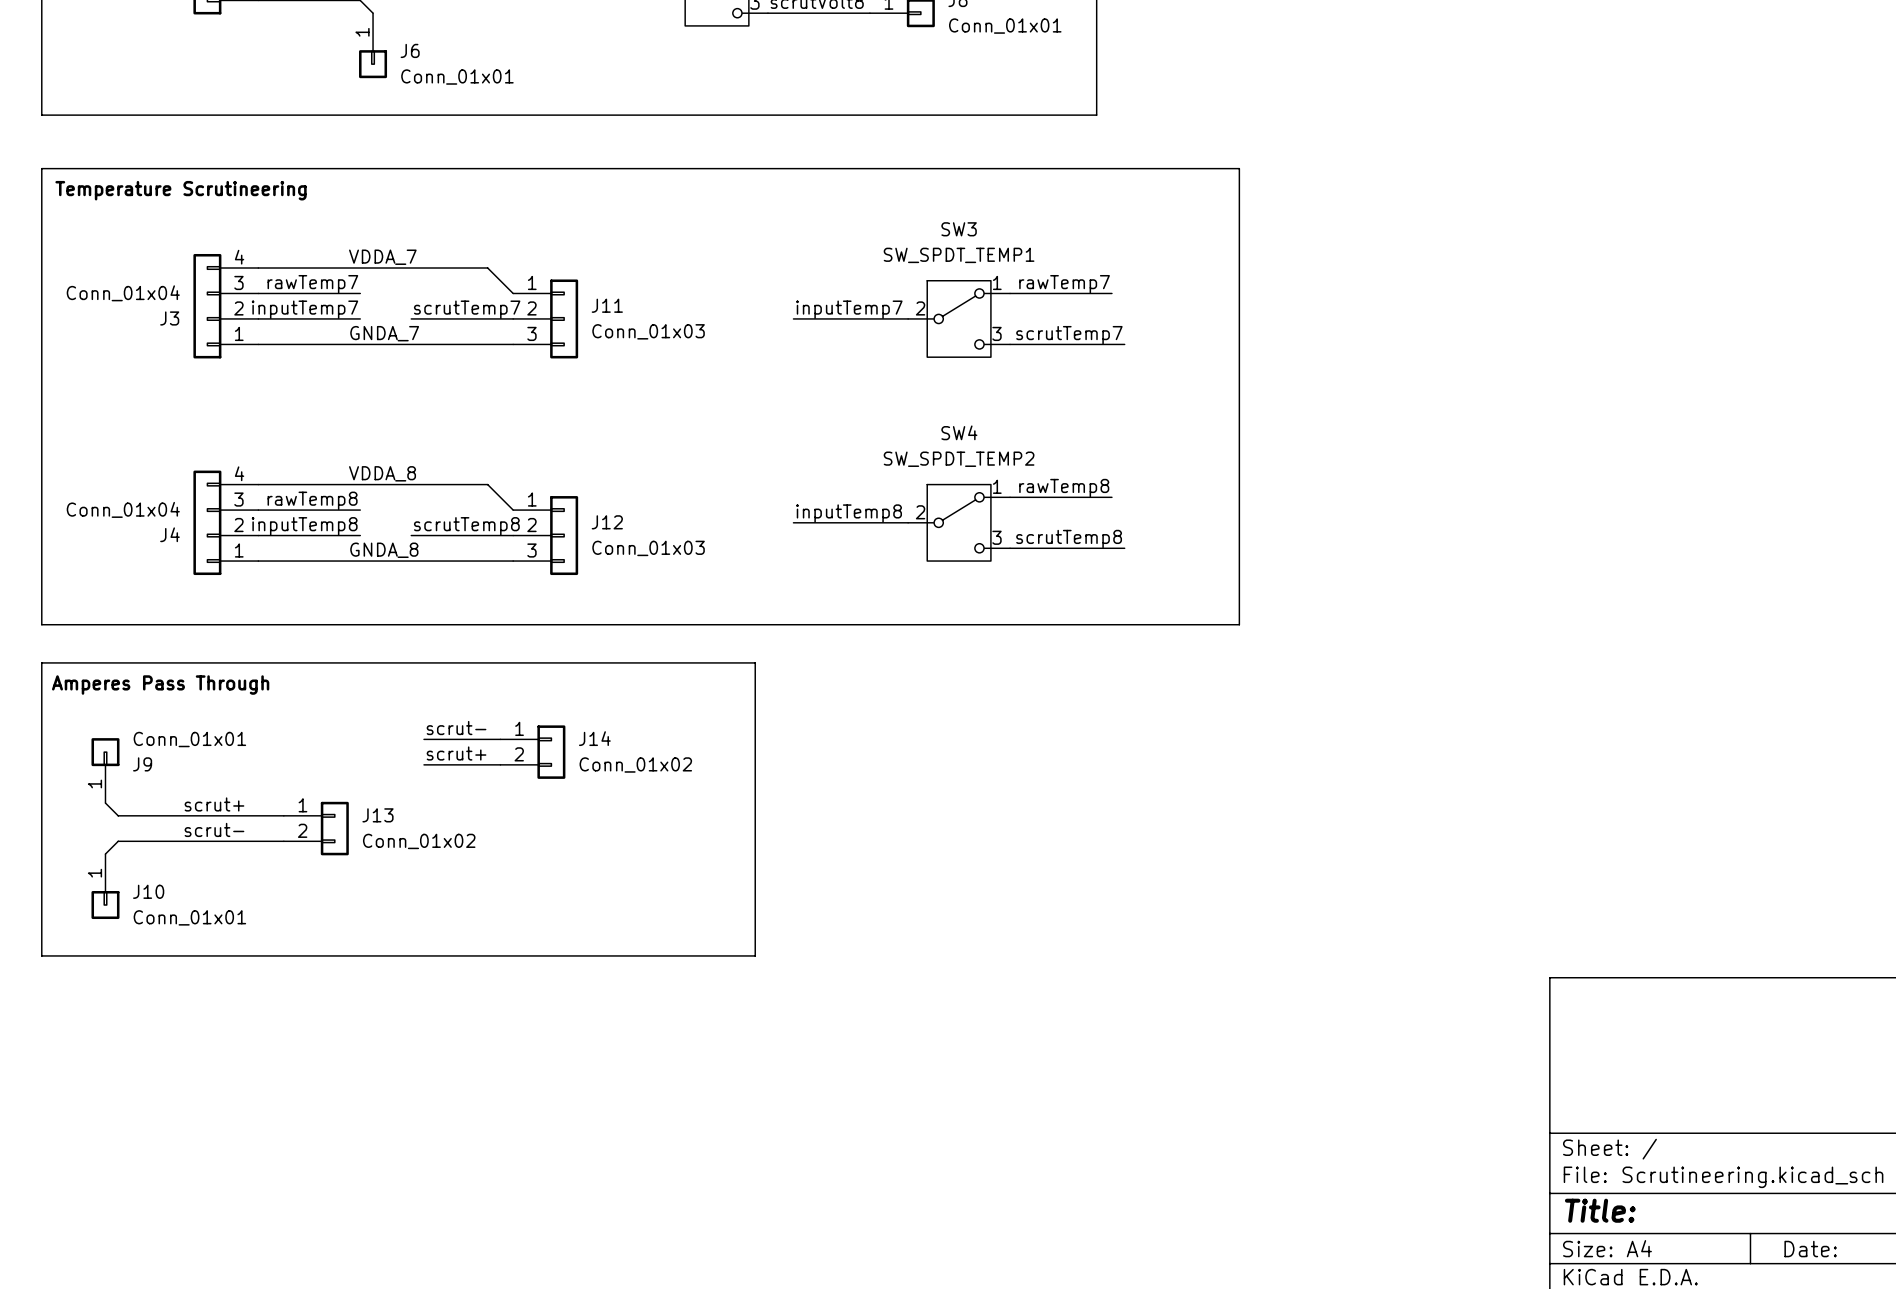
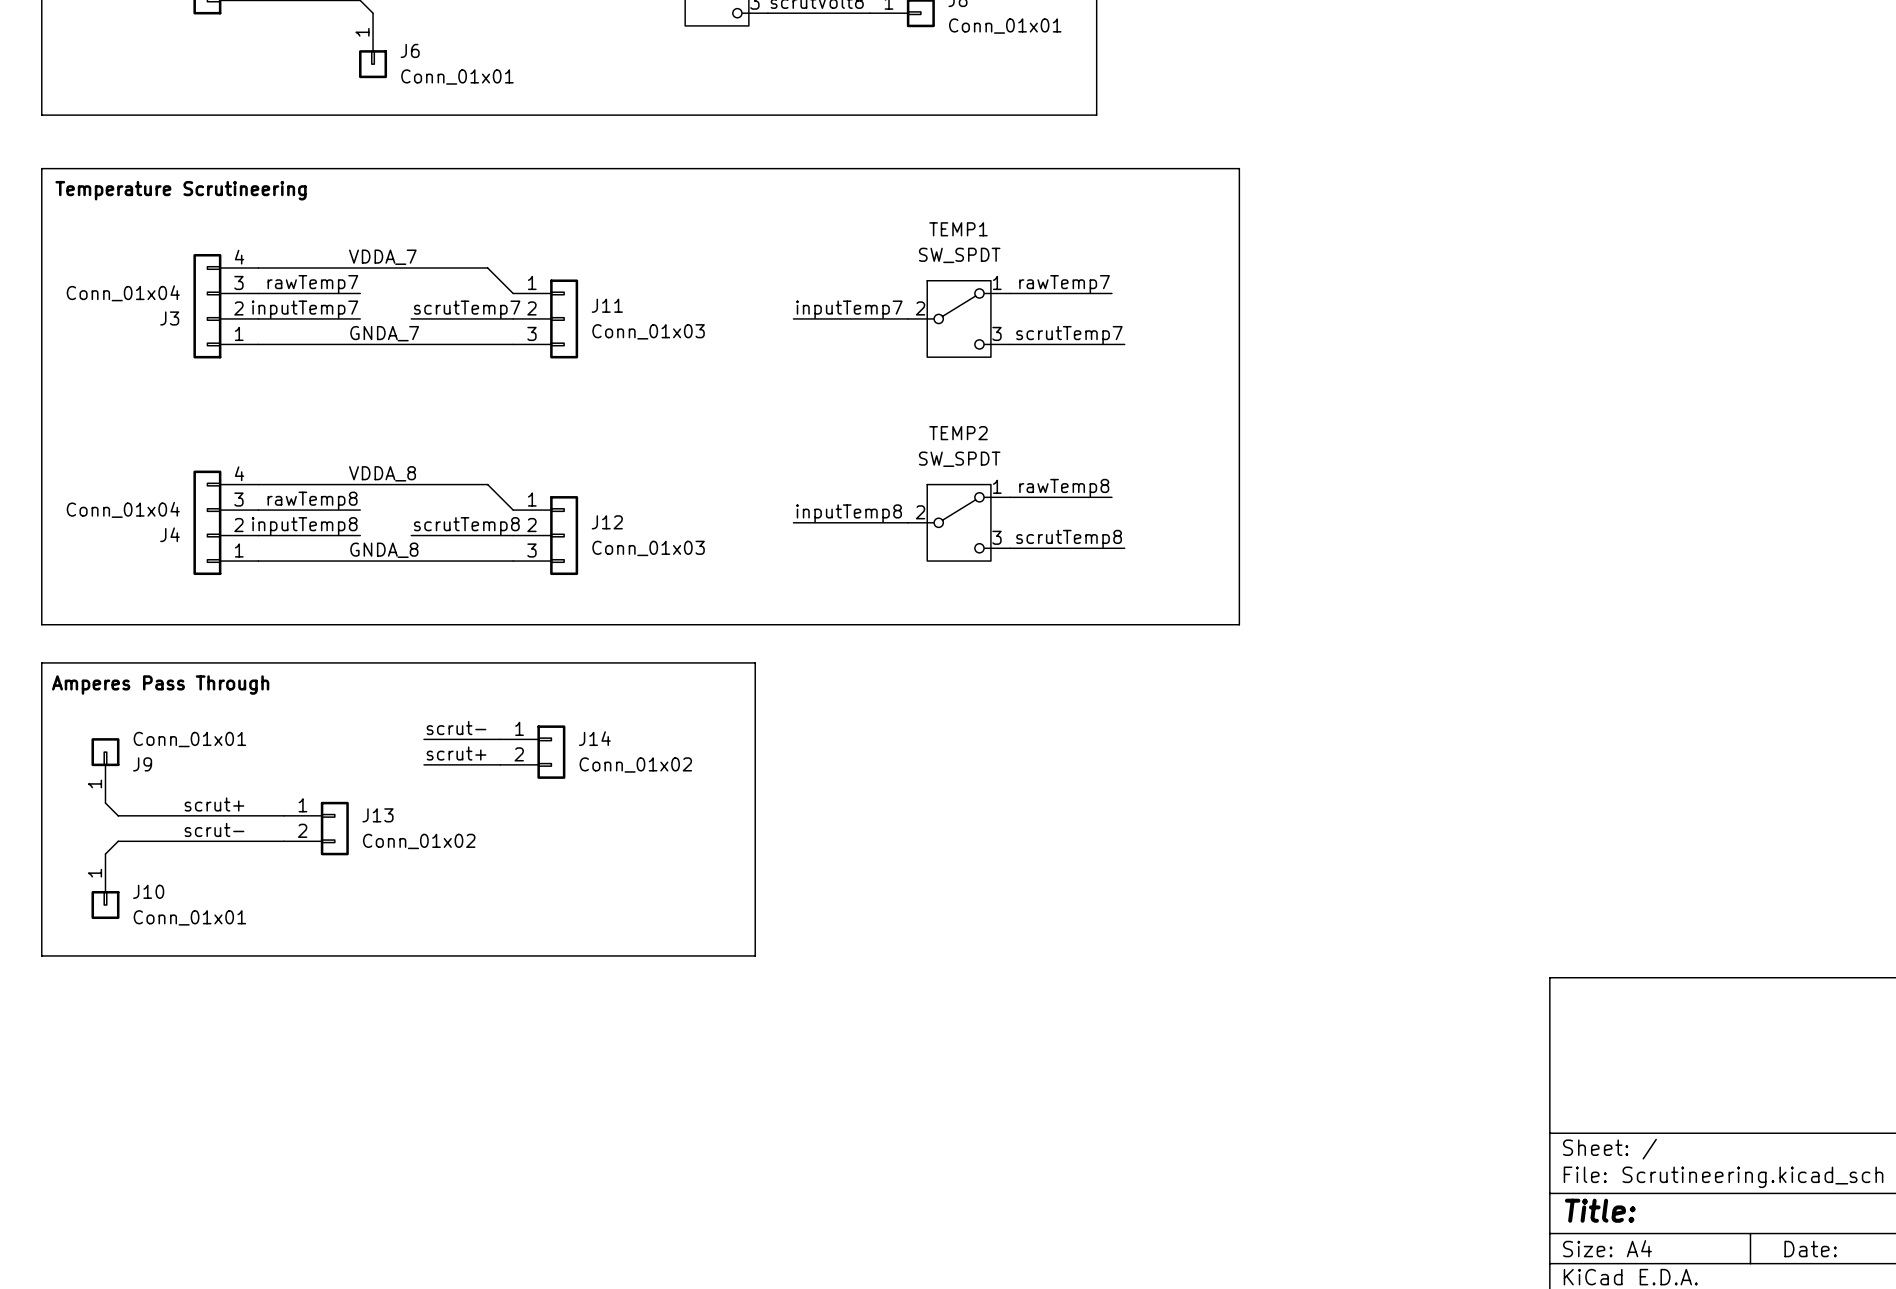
SW3 name: SW3 (959, 229) -> TEMP1 (958, 229)
SW3 value: SW_SPDT_TEMP1 (959, 255) -> SW_SPDT (959, 255)
SW4 name: SW4 (959, 432) -> TEMP2 (958, 433)
SW4 value: SW_SPDT_TEMP2 (959, 459) -> SW_SPDT (959, 459)

